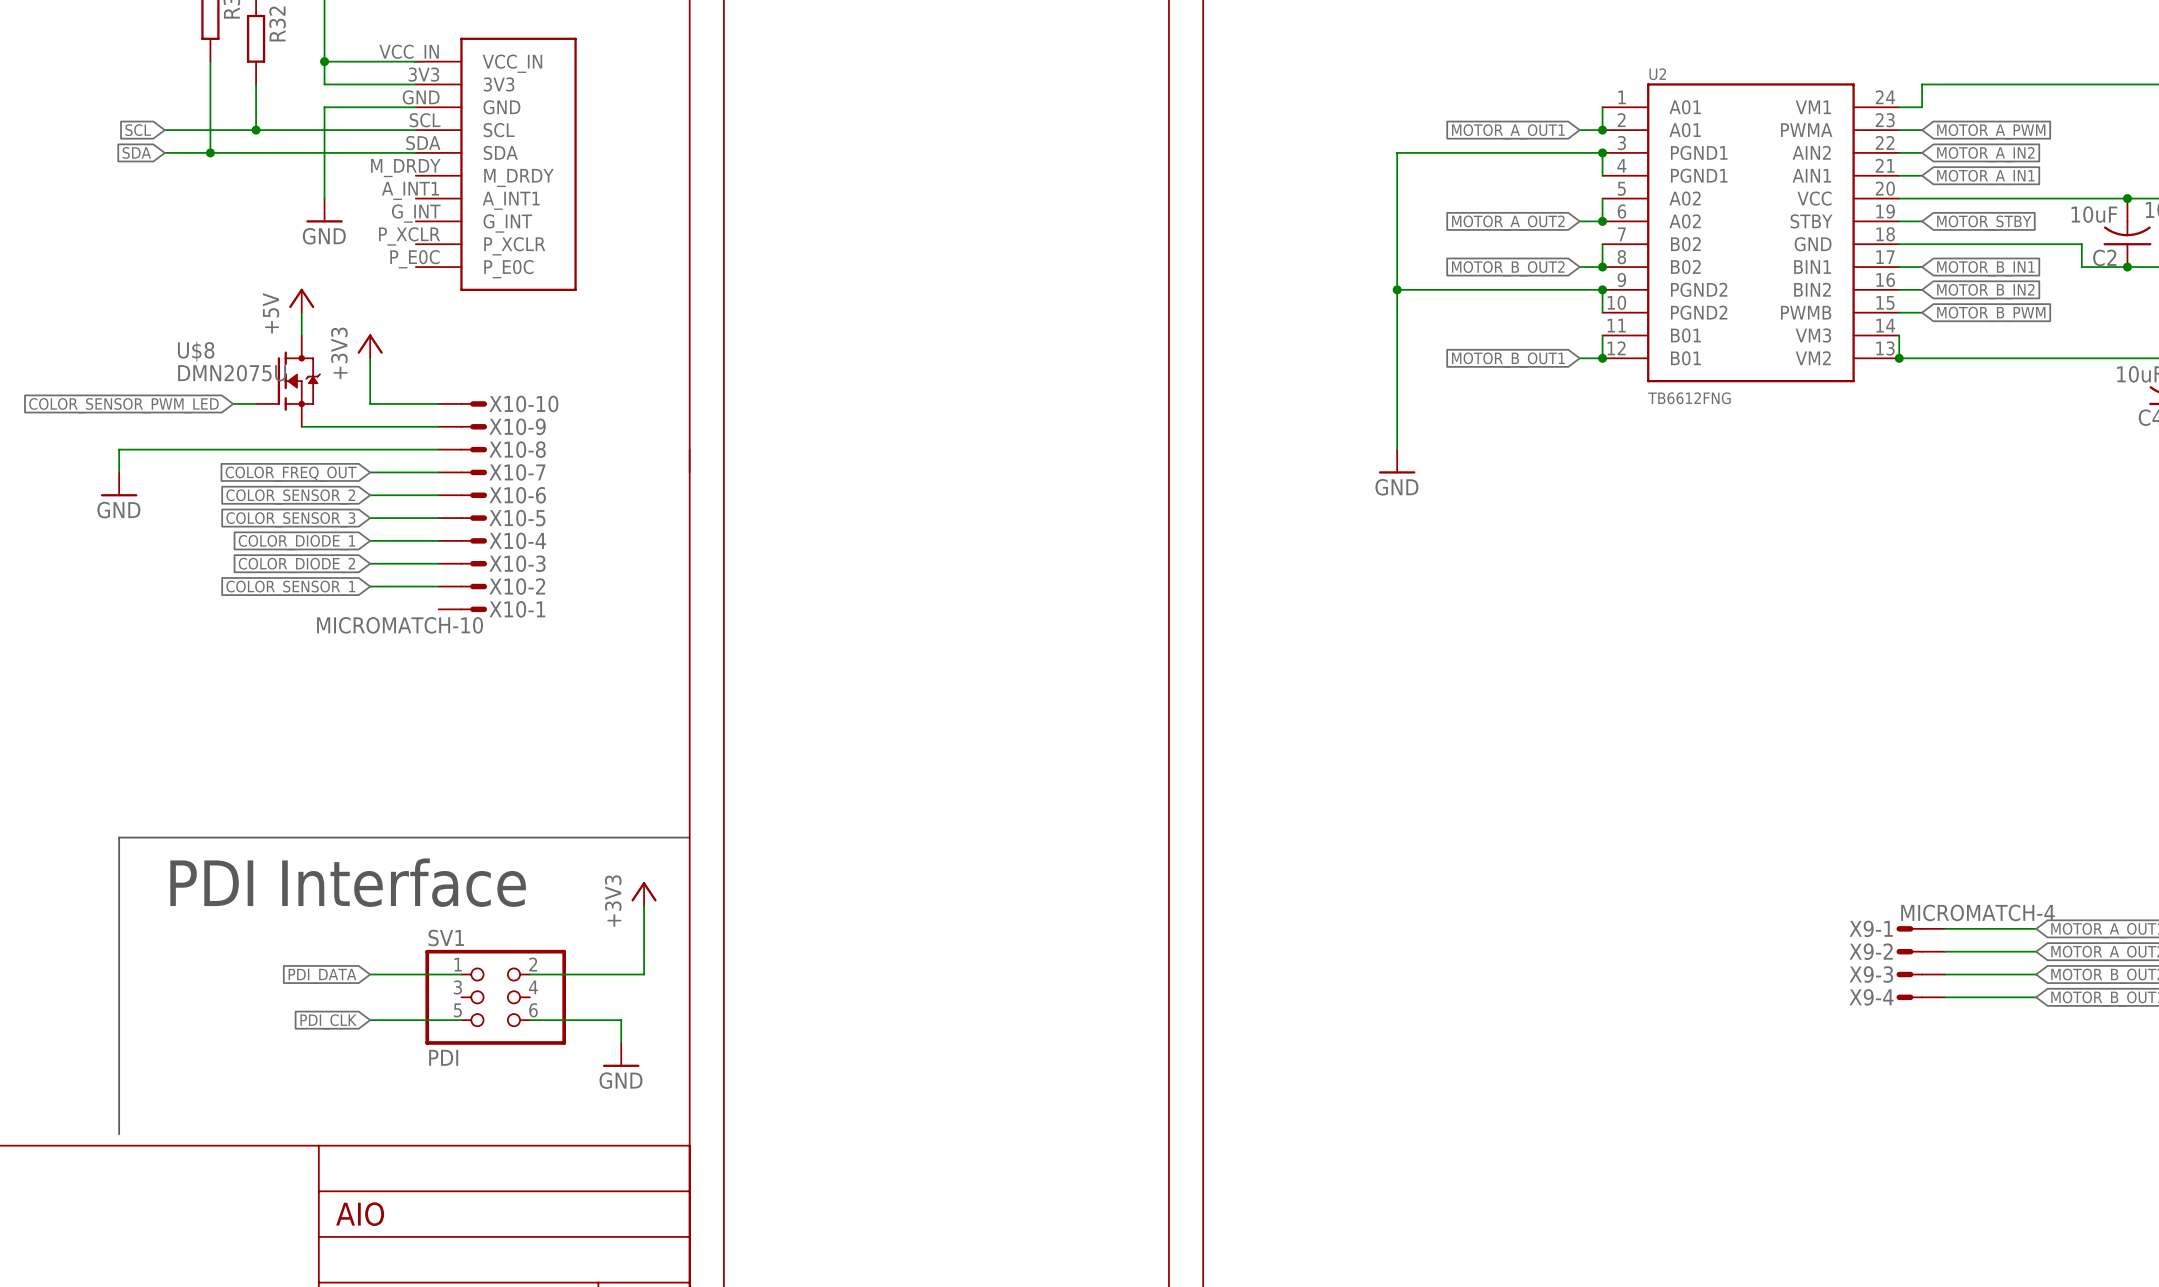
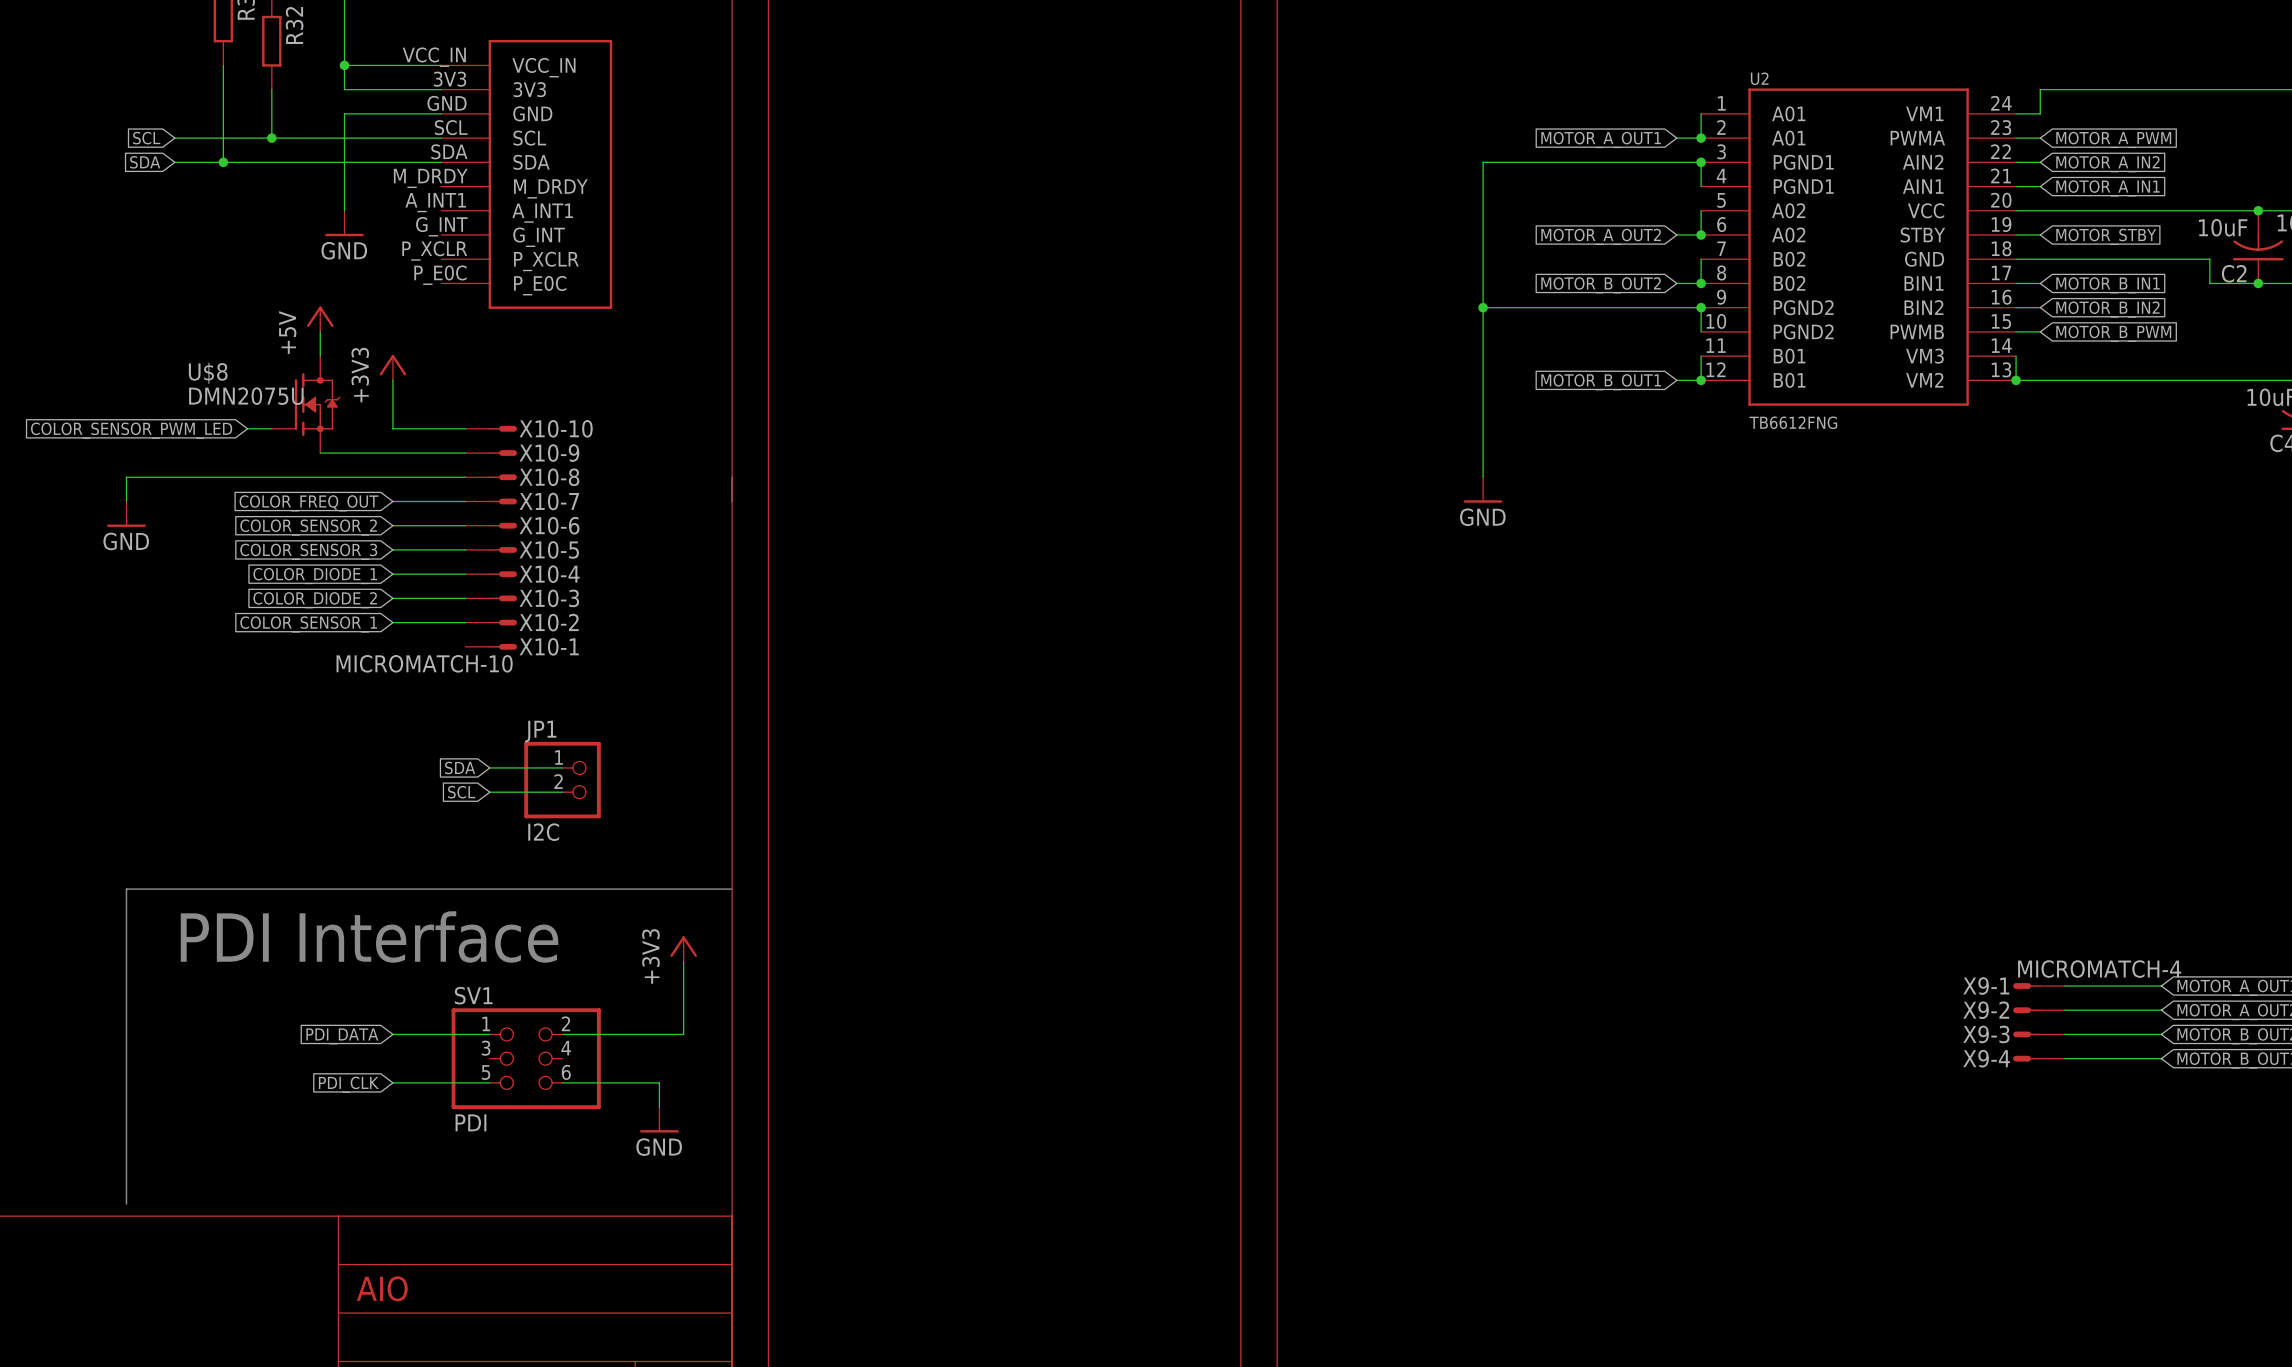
global label: none -> SDA (460, 767)
wire: none -> (489, 767) (562, 767)
JP1: none -> I2C (562, 780)
global label: none -> SCL (461, 792)
wire: none -> (489, 792) (562, 792)

